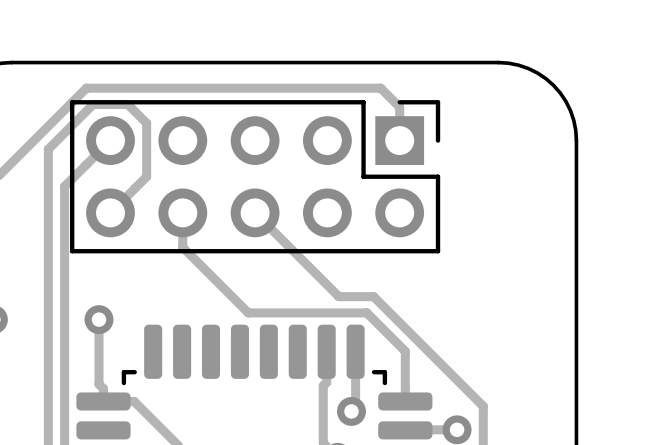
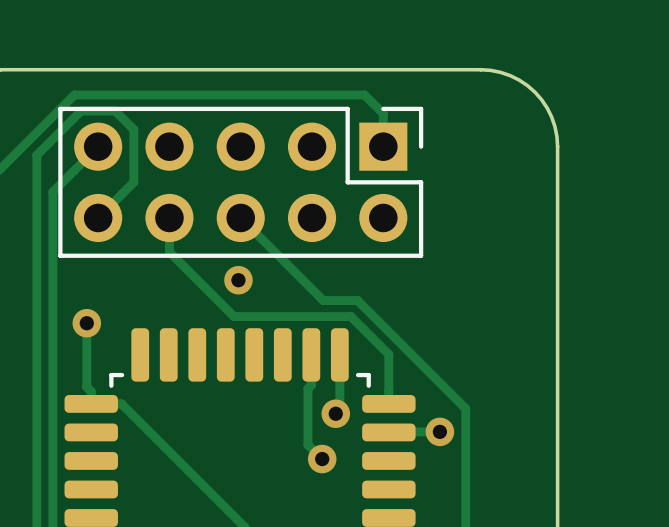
via: none -> (238, 280)

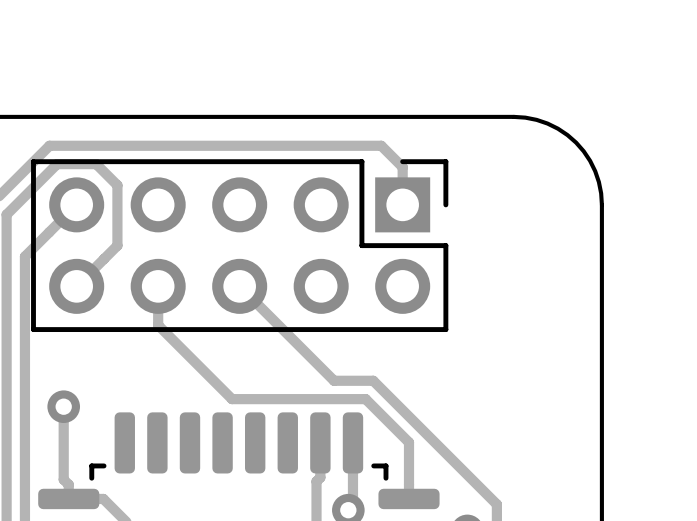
via: (238, 280) -> none

